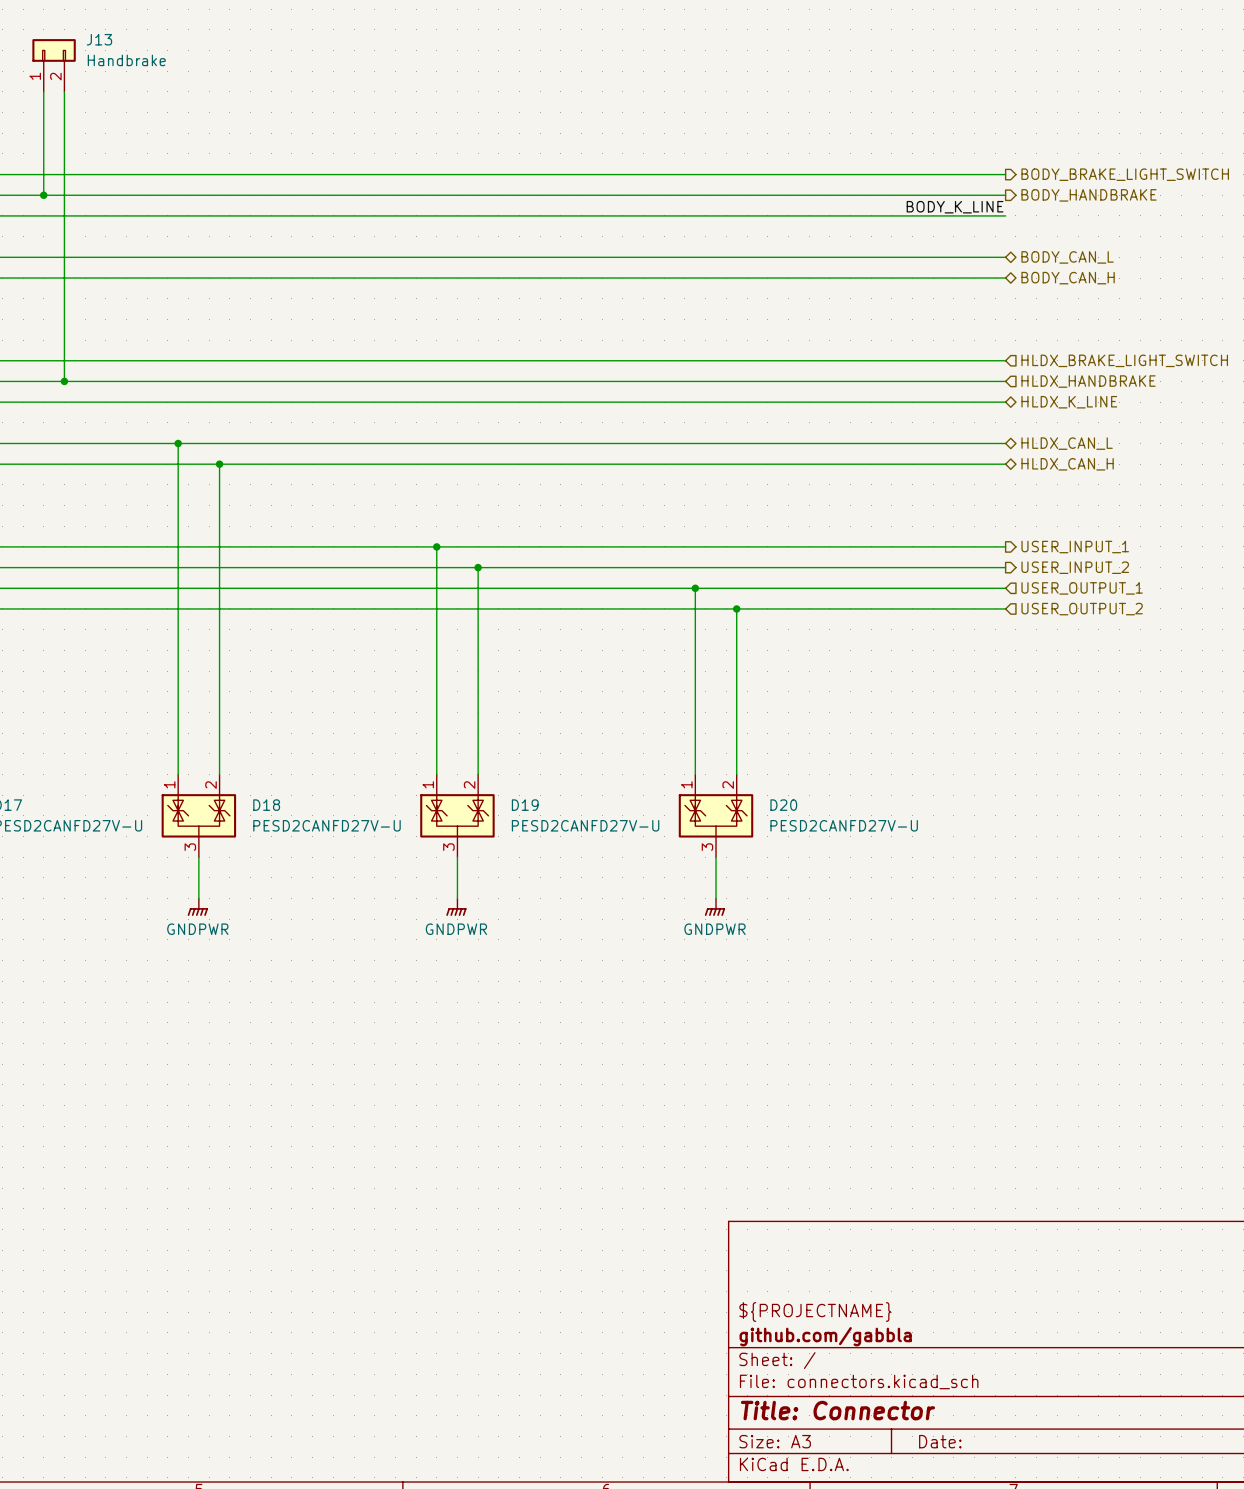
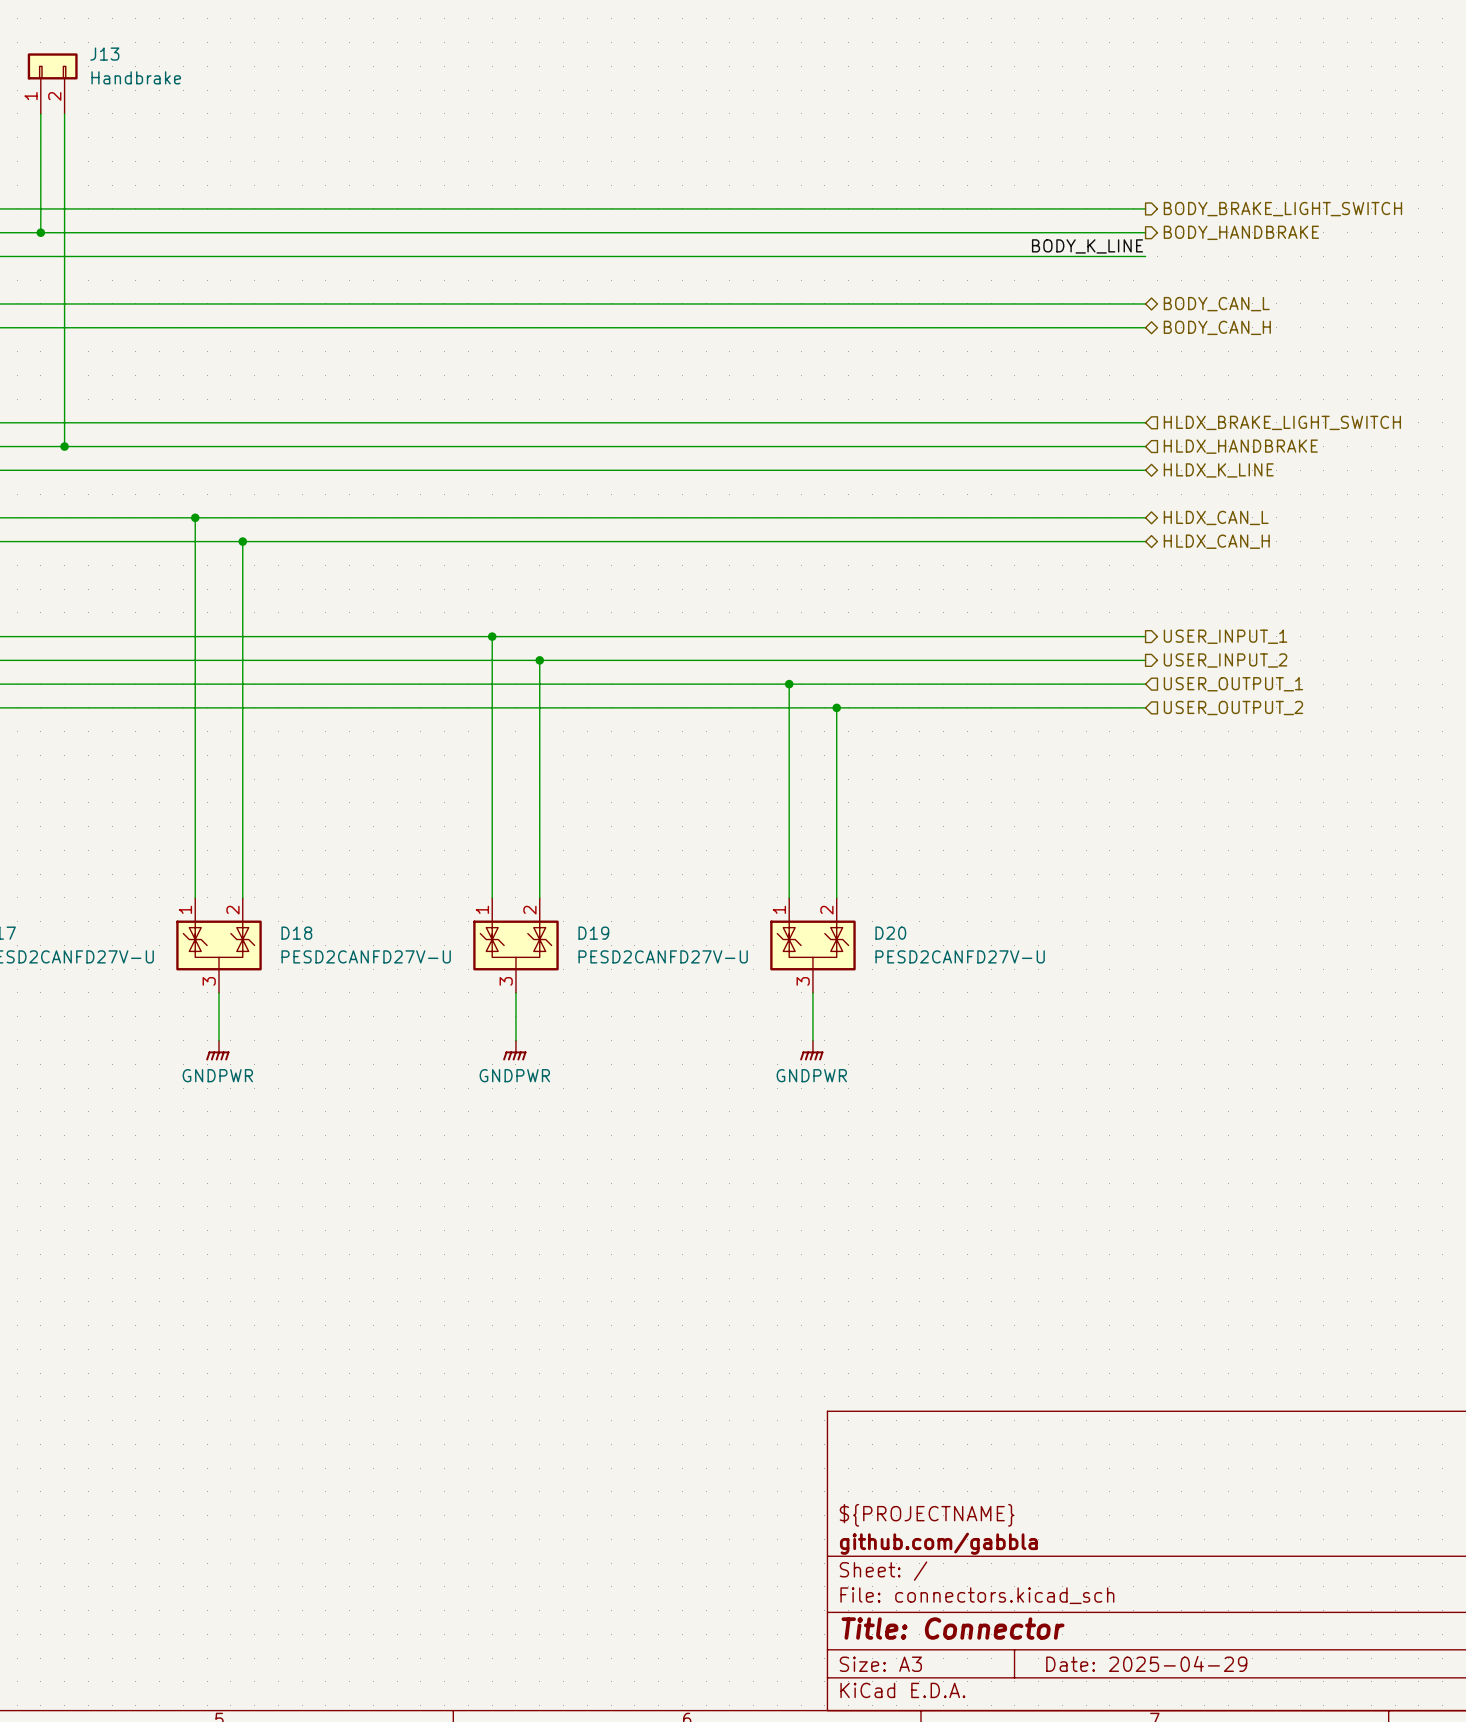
title block: Date: (940, 1441) -> Date: 2025-04-29 (1146, 1663)

